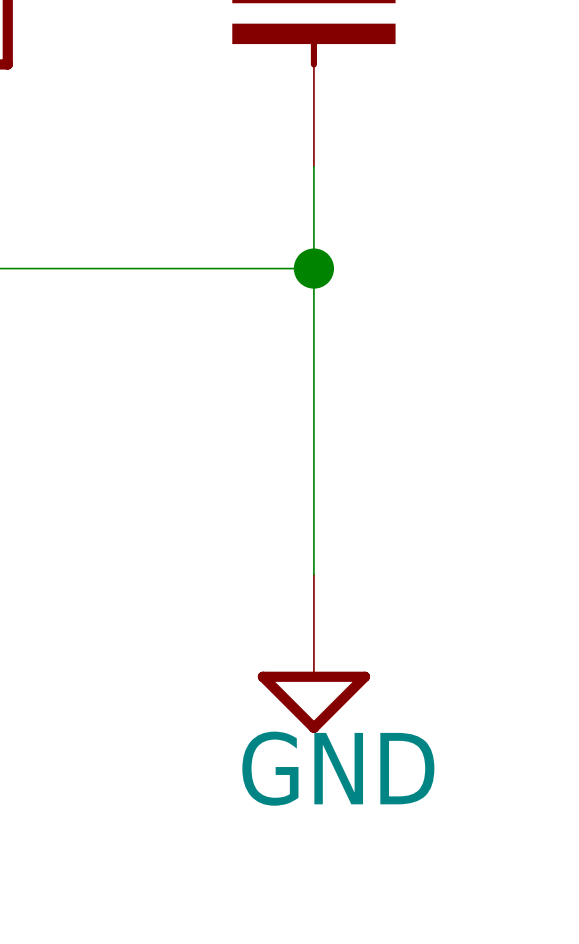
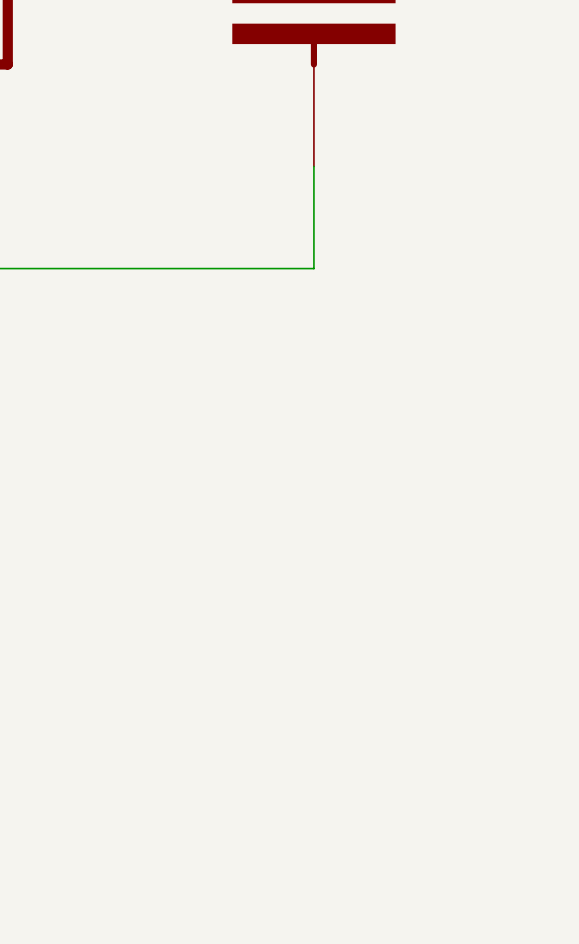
wire: (313, 268) (313, 574) -> none
junction: (313, 268) -> none
power symbol: GND (313, 653) -> none

